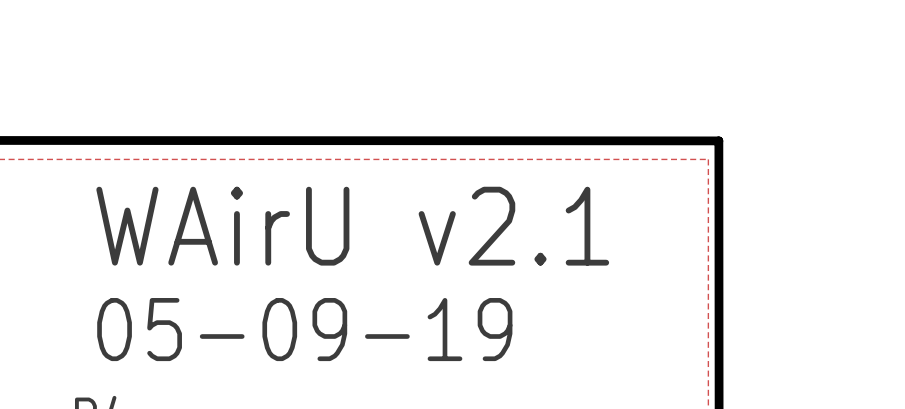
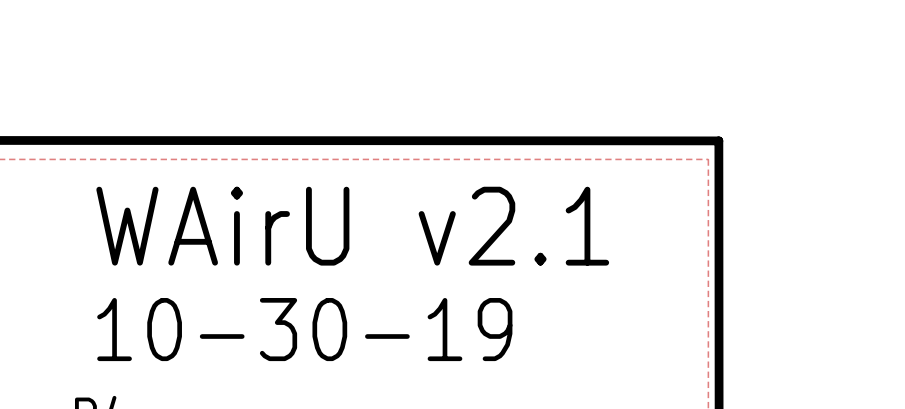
text: 05-09-19 (304, 329) -> 10-30-19 (304, 329)

